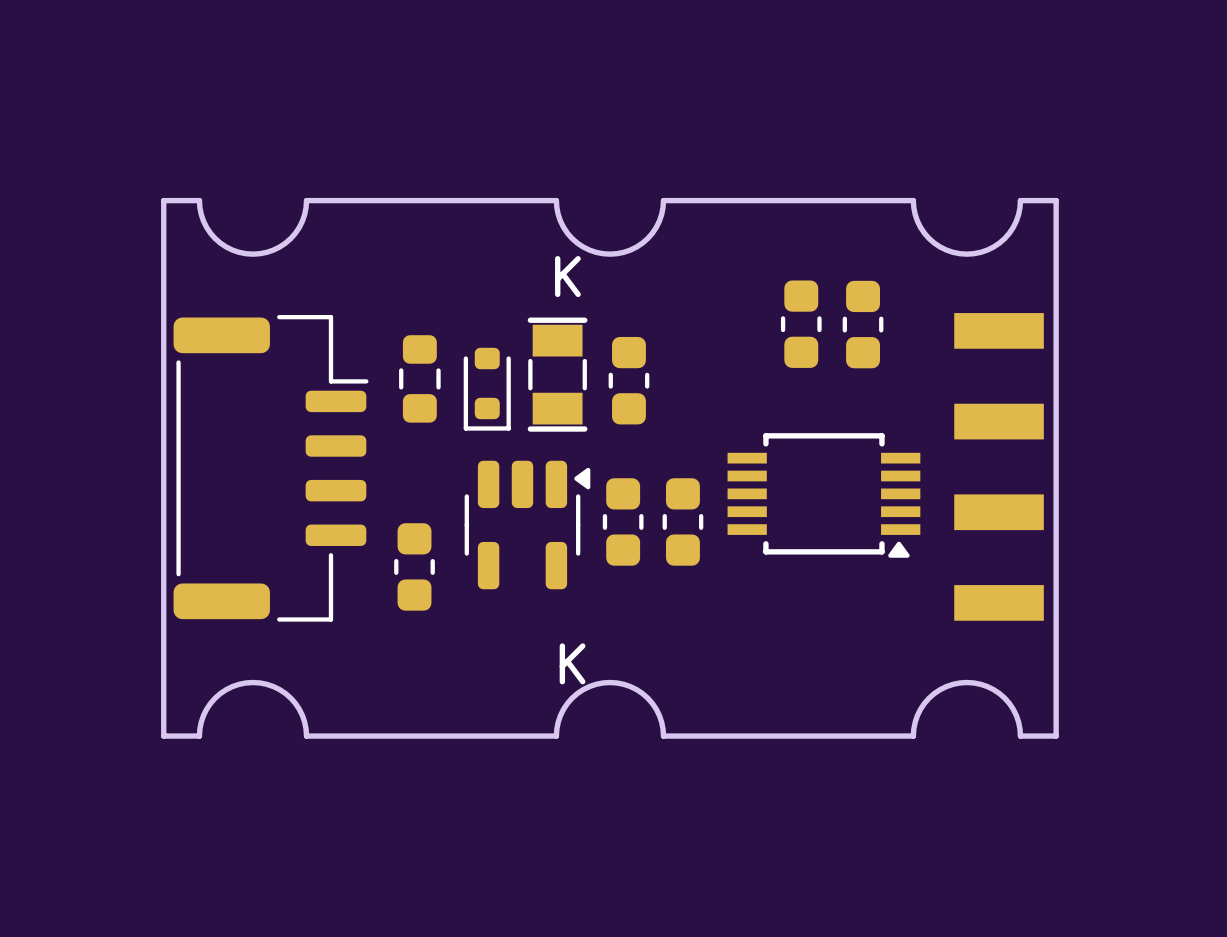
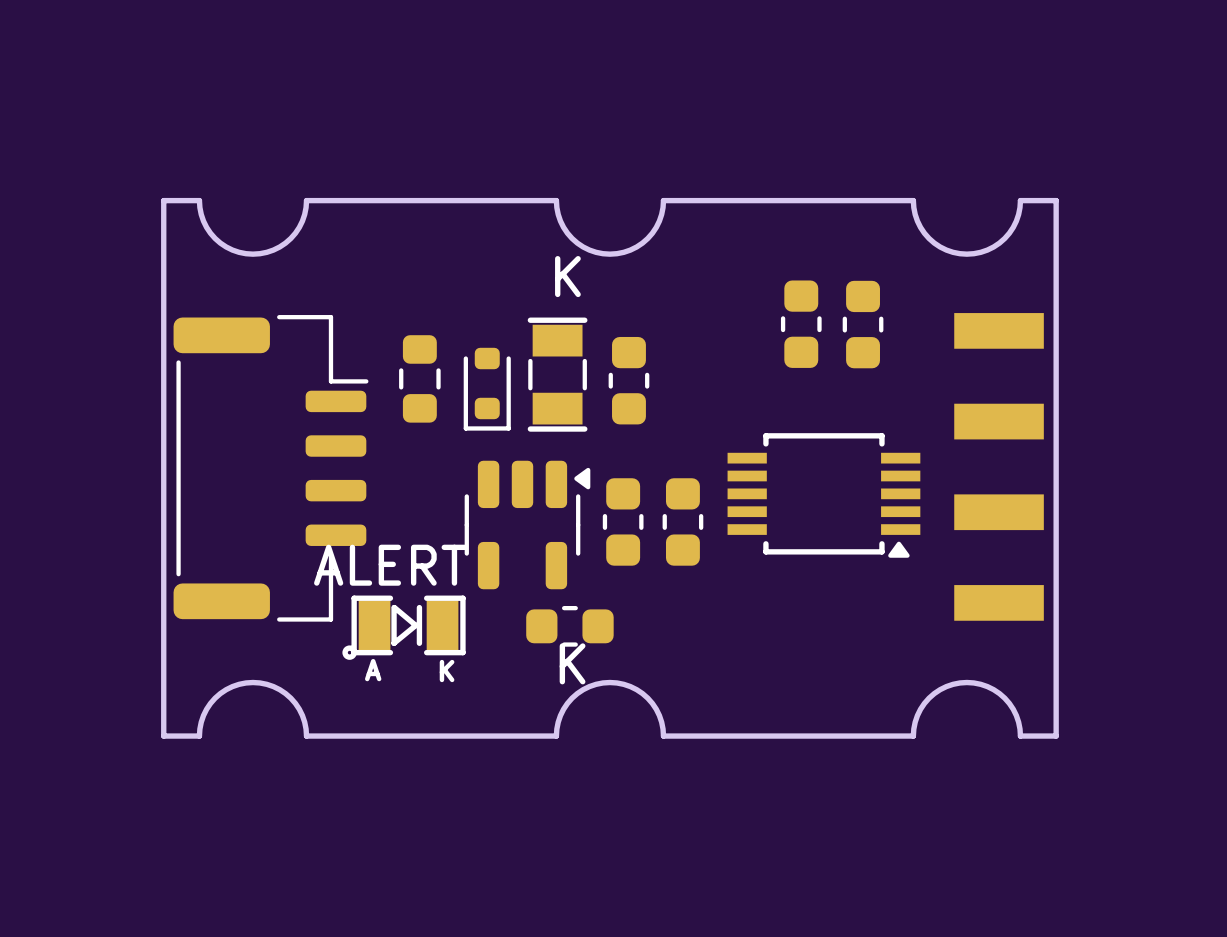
part rotation: 0° (414, 566) -> 90° clockwise (569, 626)
part position: (414, 566) -> (569, 626)
part: none -> ALERT (404, 627)

